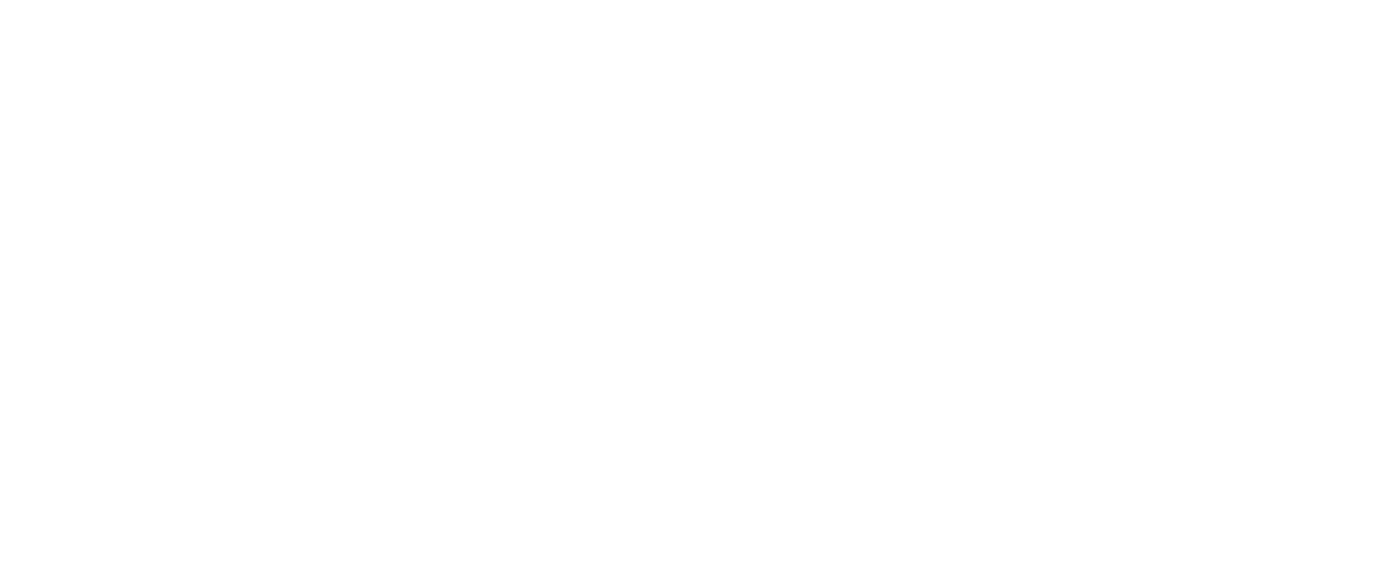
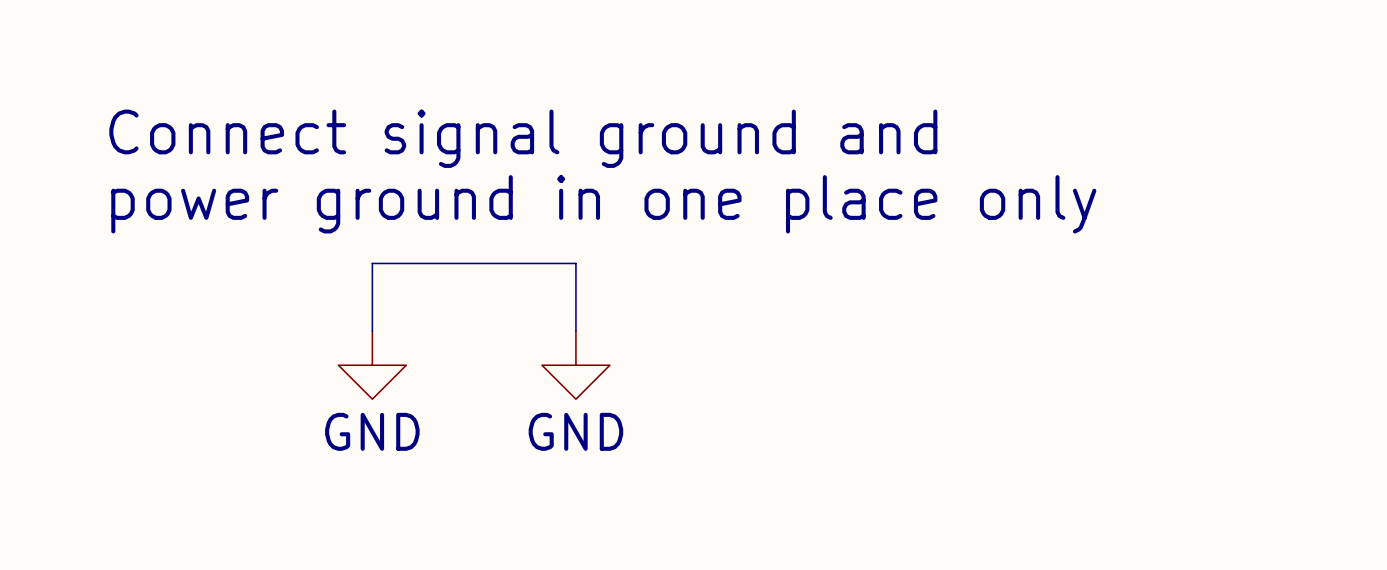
text: none -> Connect signal ground and (523, 138)
text: none -> power ground in one place only (603, 204)
wire: none -> (372, 331) (372, 263) (575, 263) (575, 331)
power symbol: none -> GND (372, 365)
power symbol: none -> GND (575, 365)

